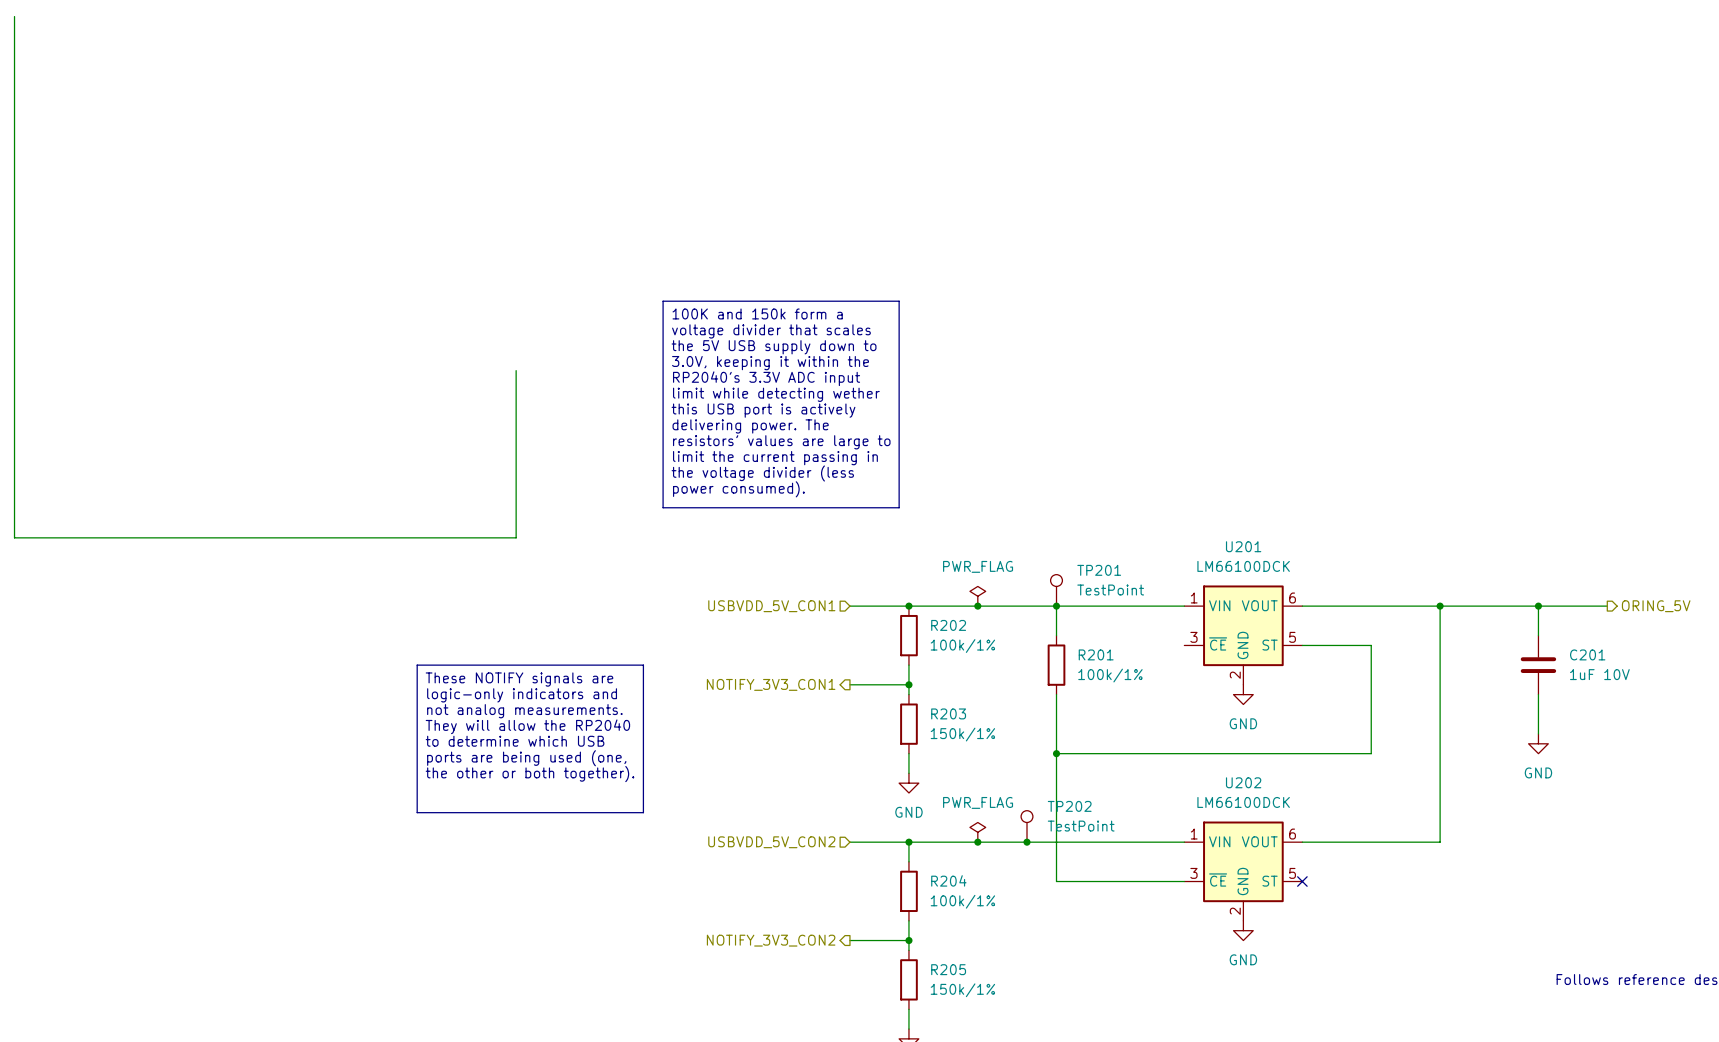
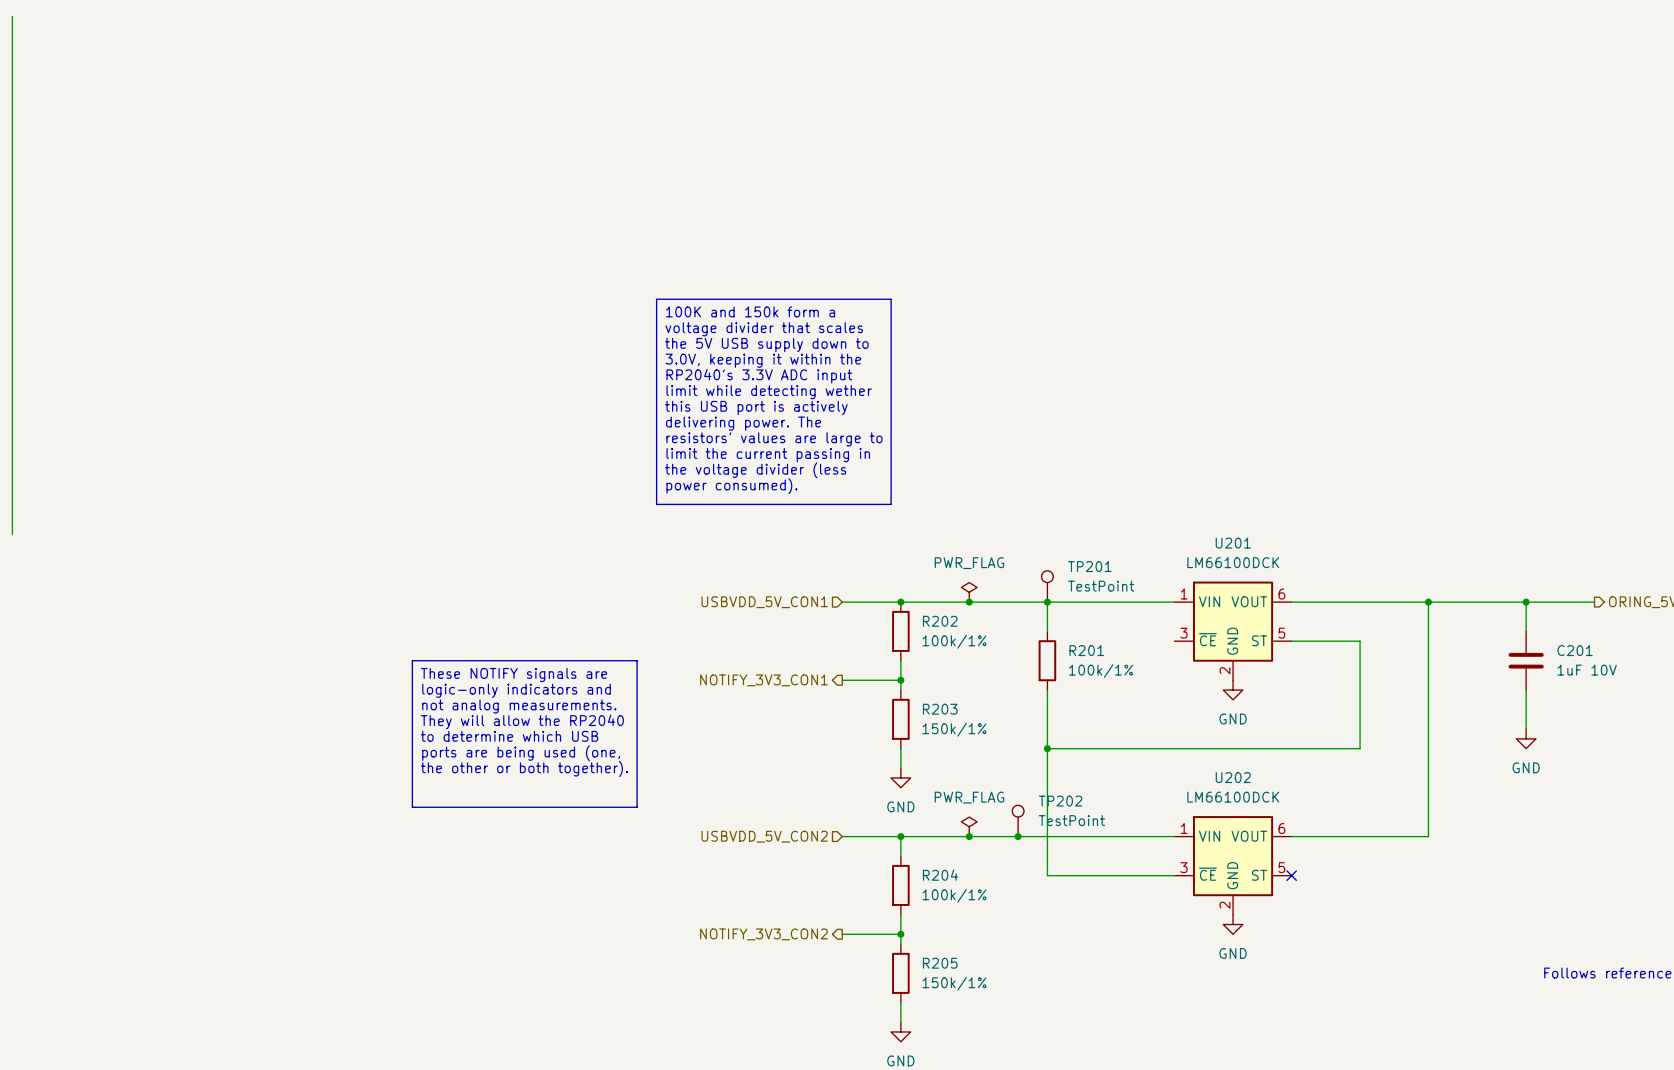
wire: (516, 370) (516, 537) (14, 537) -> none

